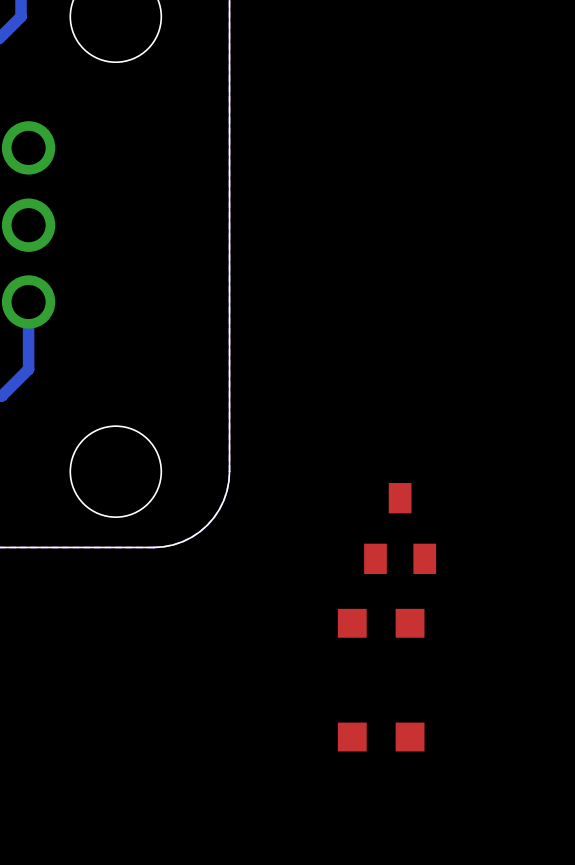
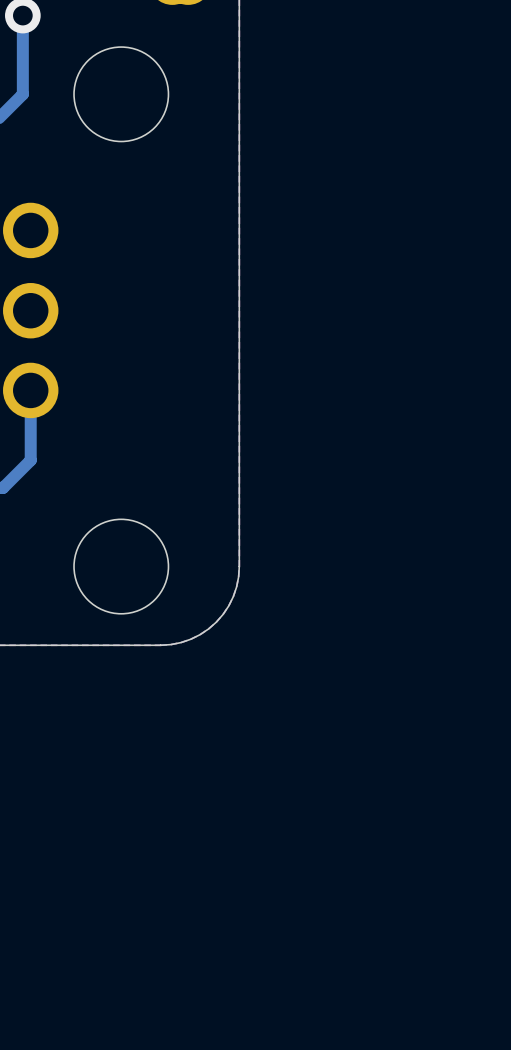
part: (400, 528) -> none
part: (381, 623) -> none
part: (381, 737) -> none

